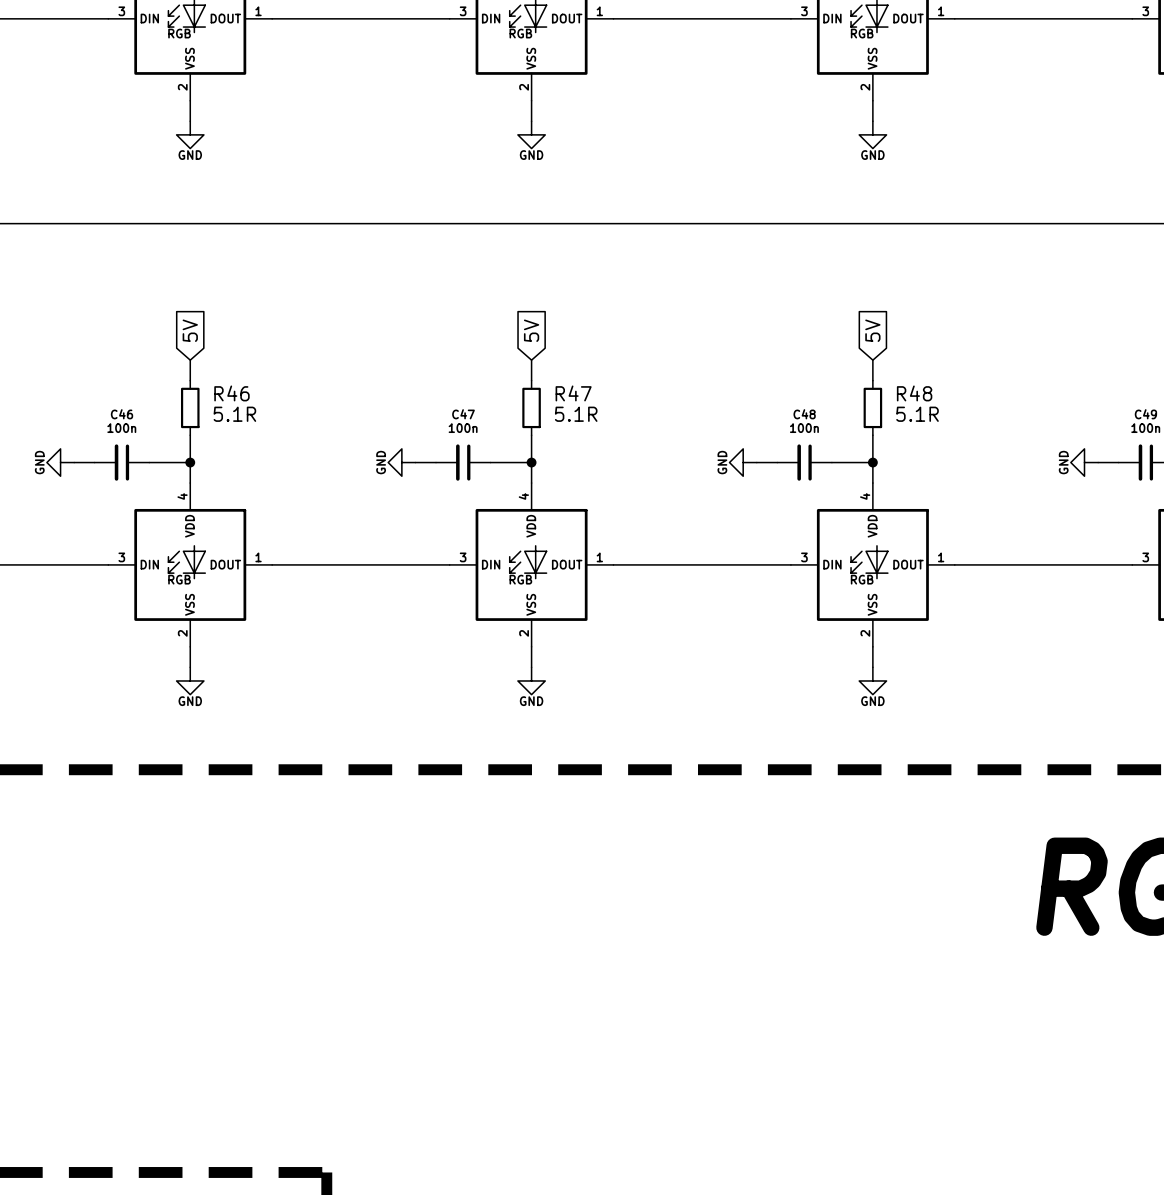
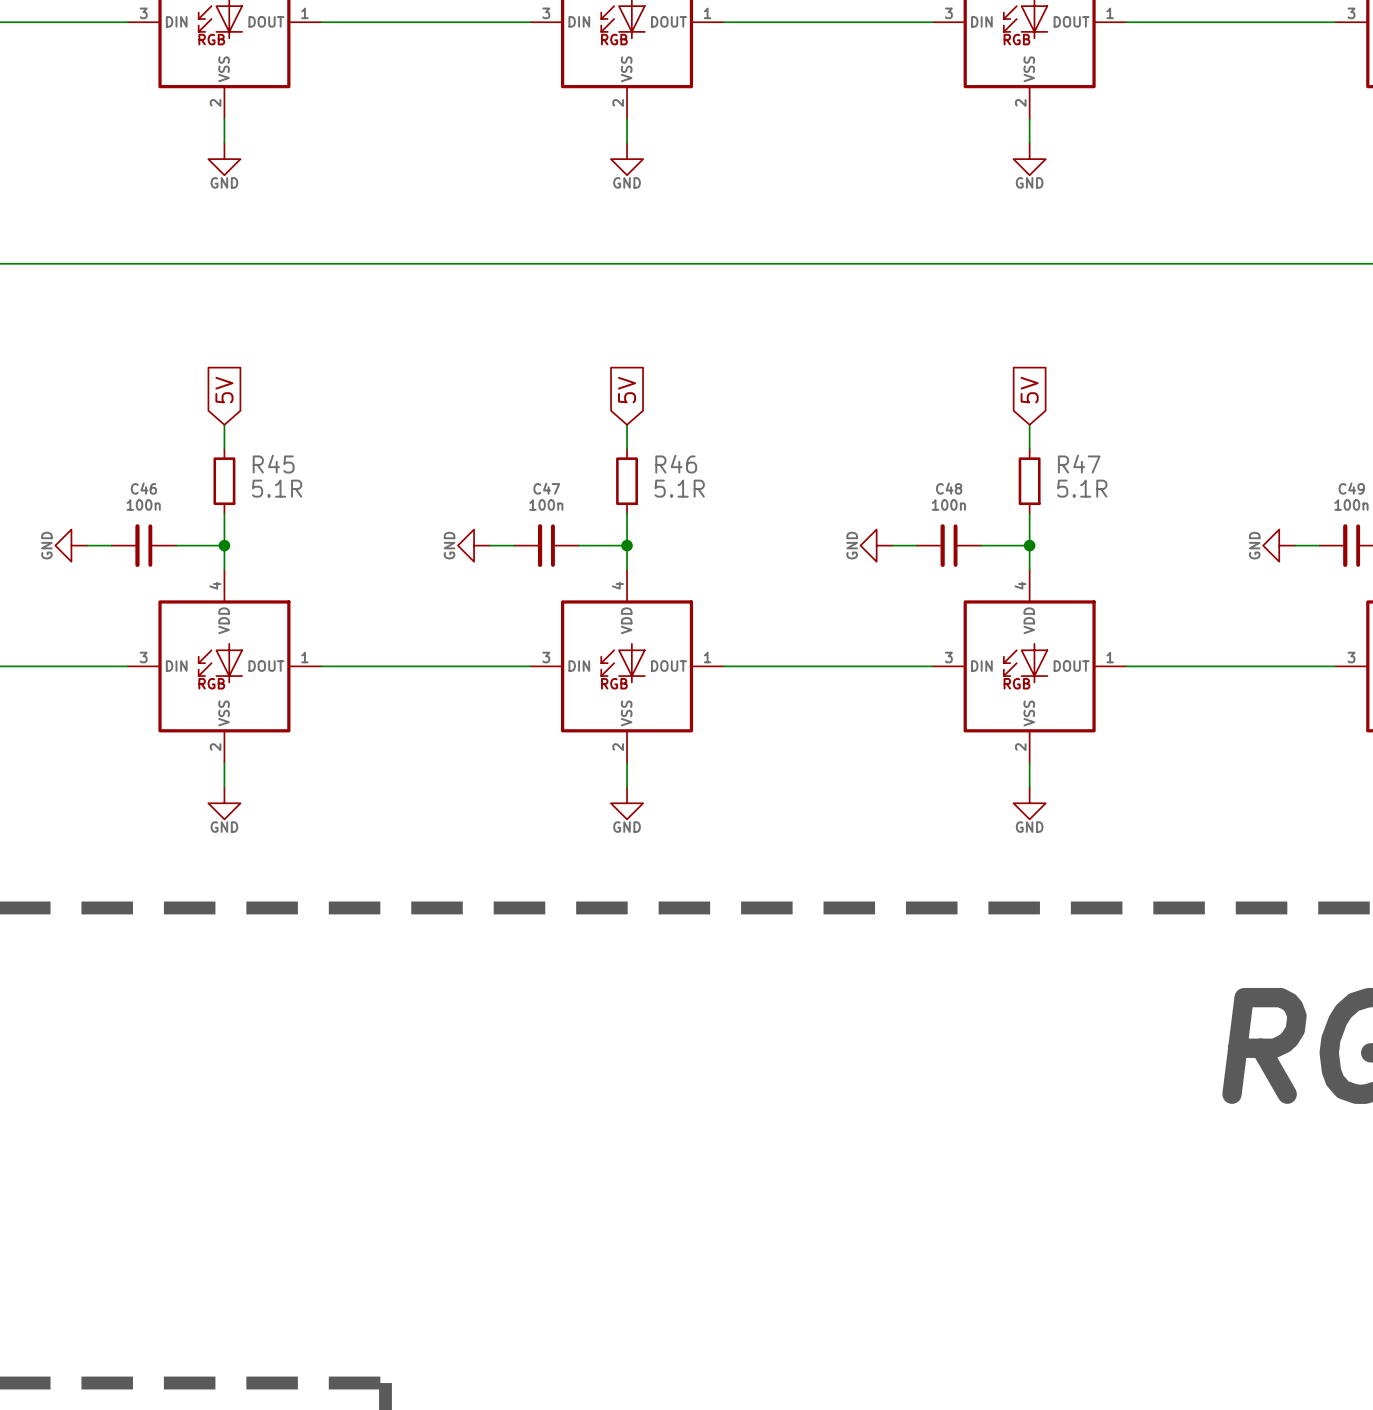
R46 name: R46 (231, 393) -> R45 (273, 464)
R47 name: R47 (573, 393) -> R46 (676, 464)
R48 name: R48 (914, 393) -> R47 (1079, 464)

